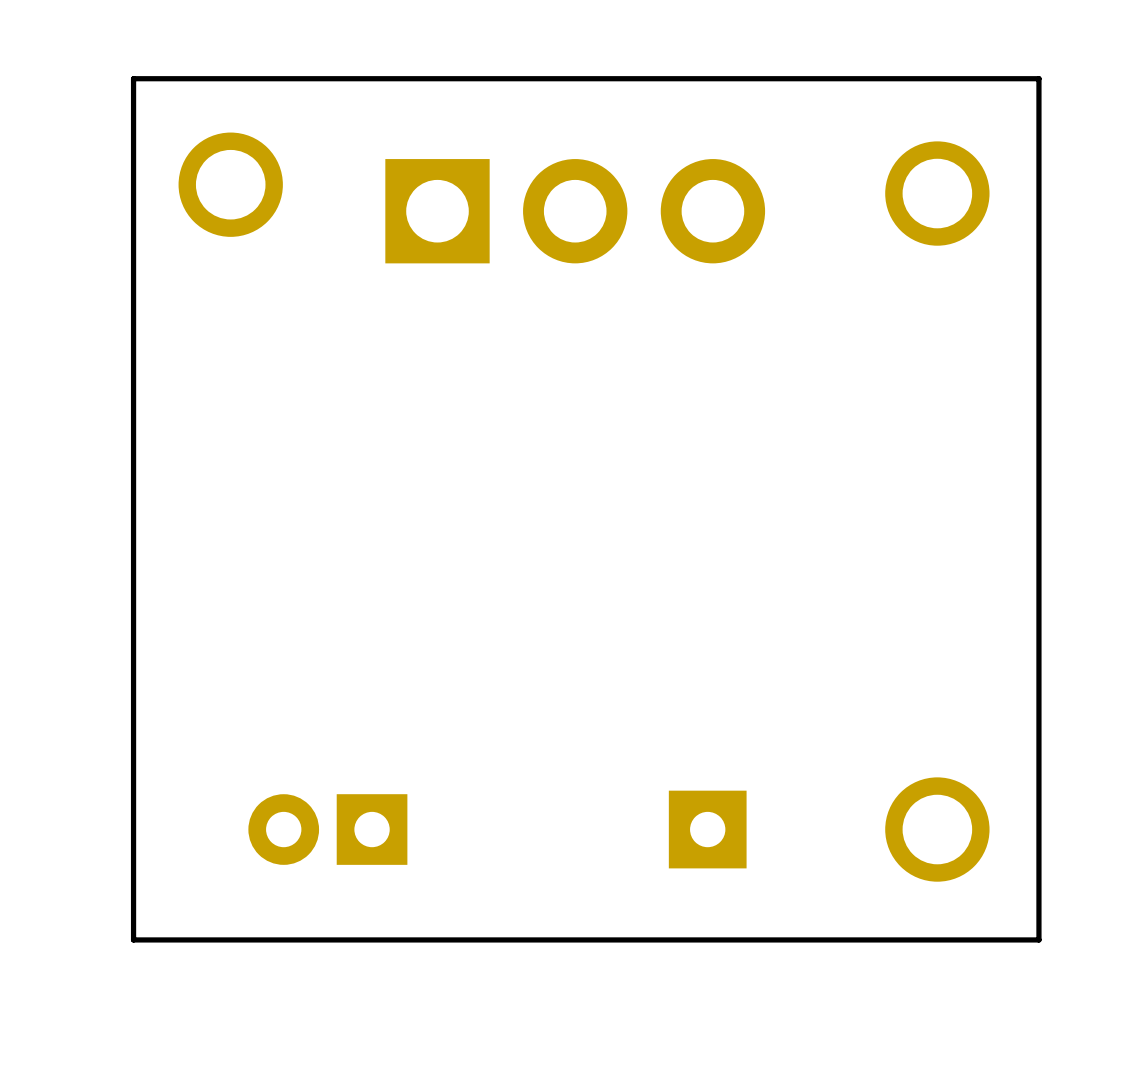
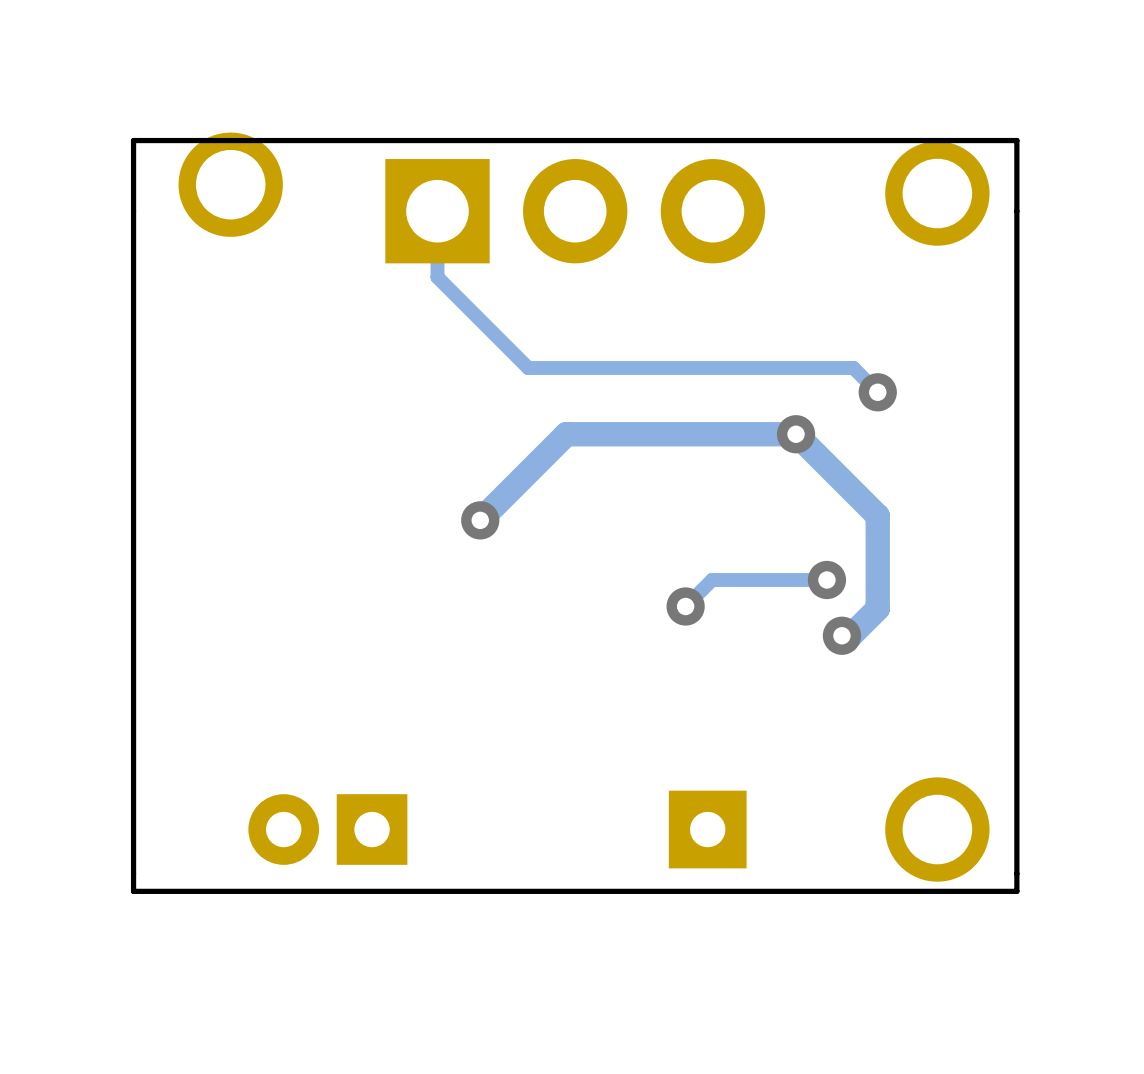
board edge: (133, 140) (133, 78) (1038, 78) (1038, 939) (133, 939) (133, 891) -> (133, 140) (1016, 140) (1016, 891) (133, 891)
track: none -> (437, 211) (437, 277) (528, 367) (853, 367) (877, 392)
via: none -> (877, 392)
via: none -> (796, 434)
track: none -> (480, 520) (566, 434) (796, 434) (877, 515) (877, 608) (850, 635) (841, 635)
via: none -> (480, 520)
track: none -> (826, 579) (712, 579) (685, 606)
via: none -> (826, 579)
via: none -> (685, 606)
via: none -> (841, 635)

